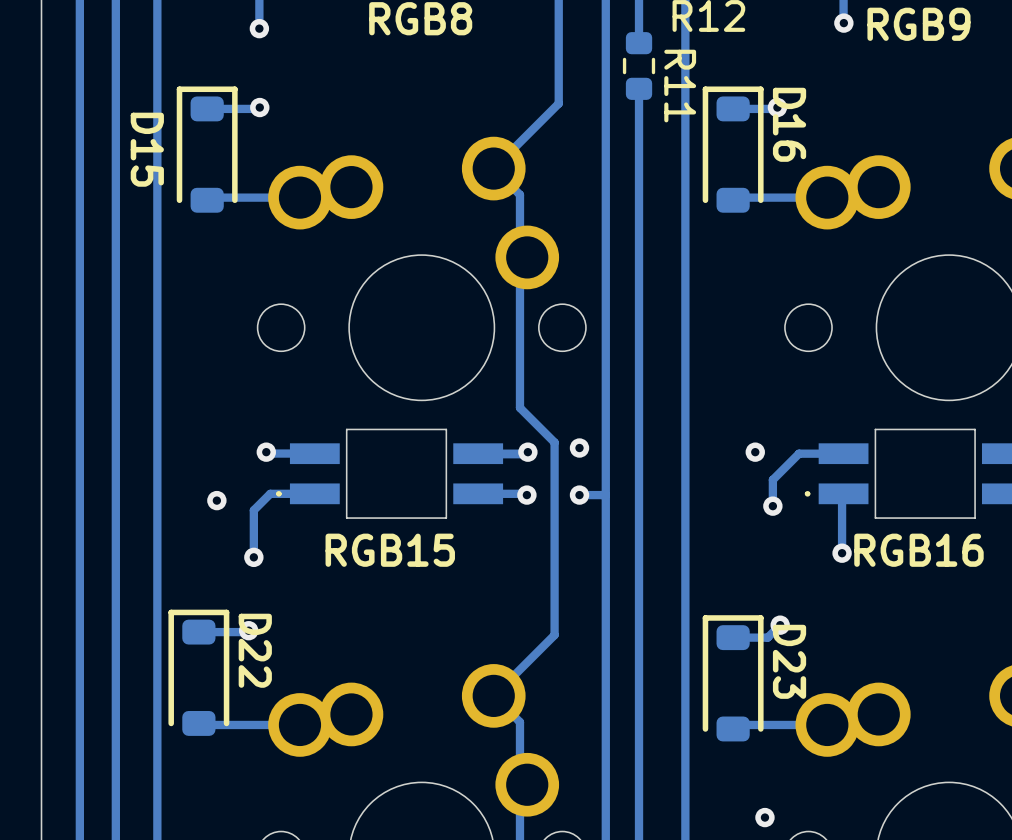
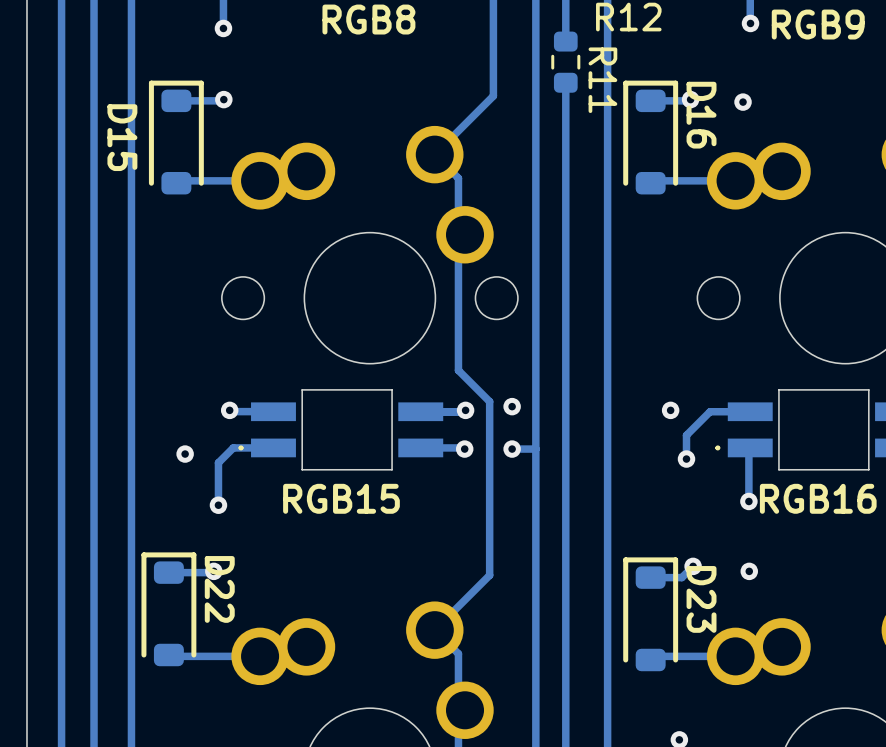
via: none -> (743, 102)
via: none -> (749, 571)

